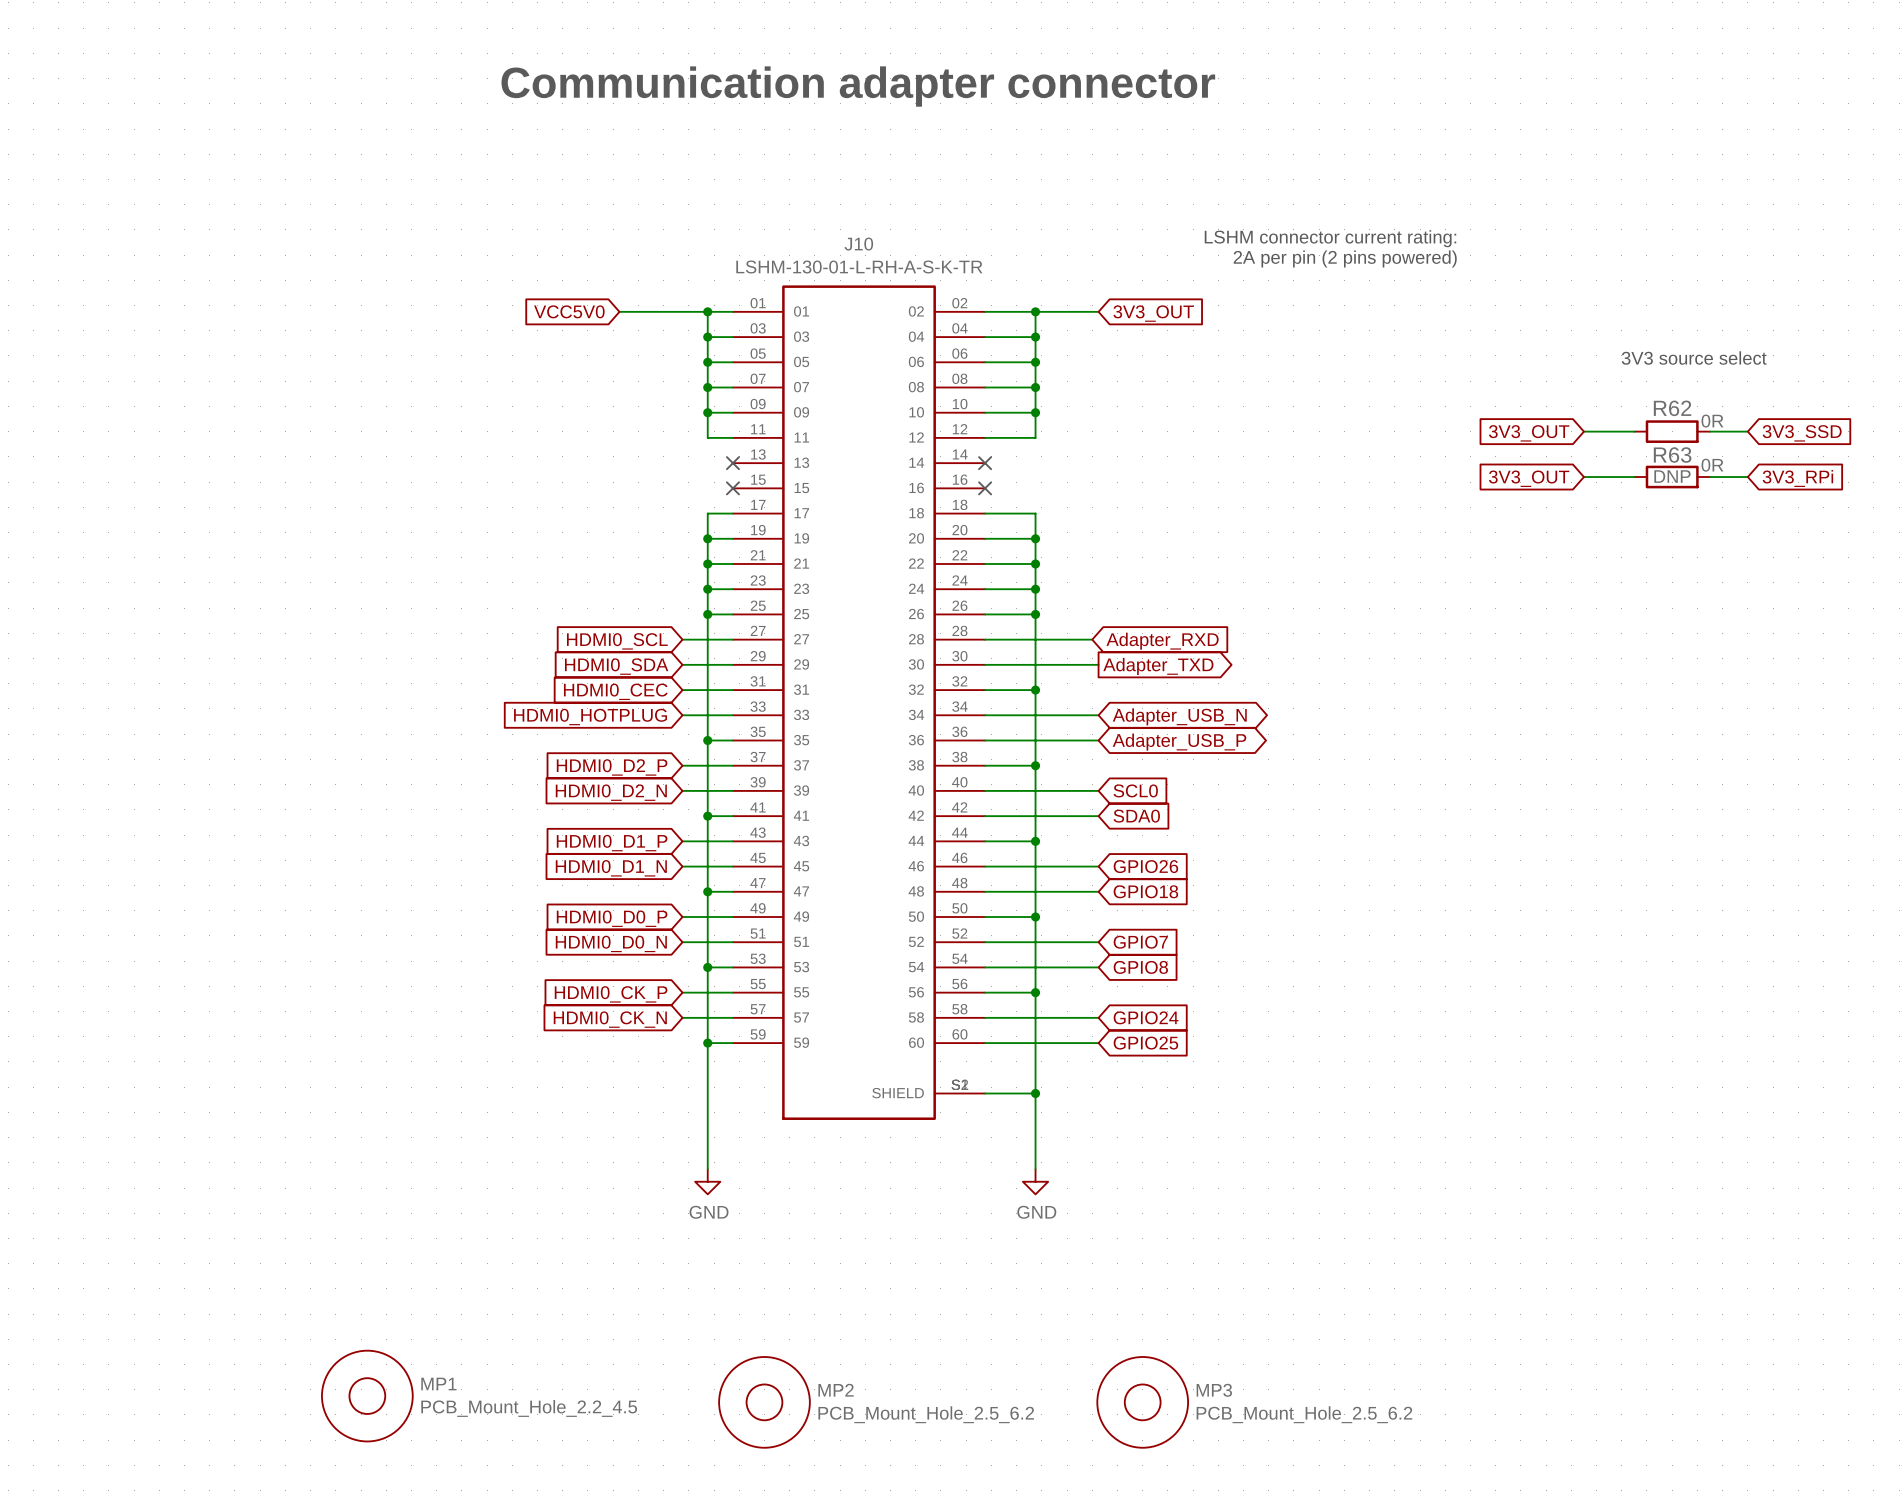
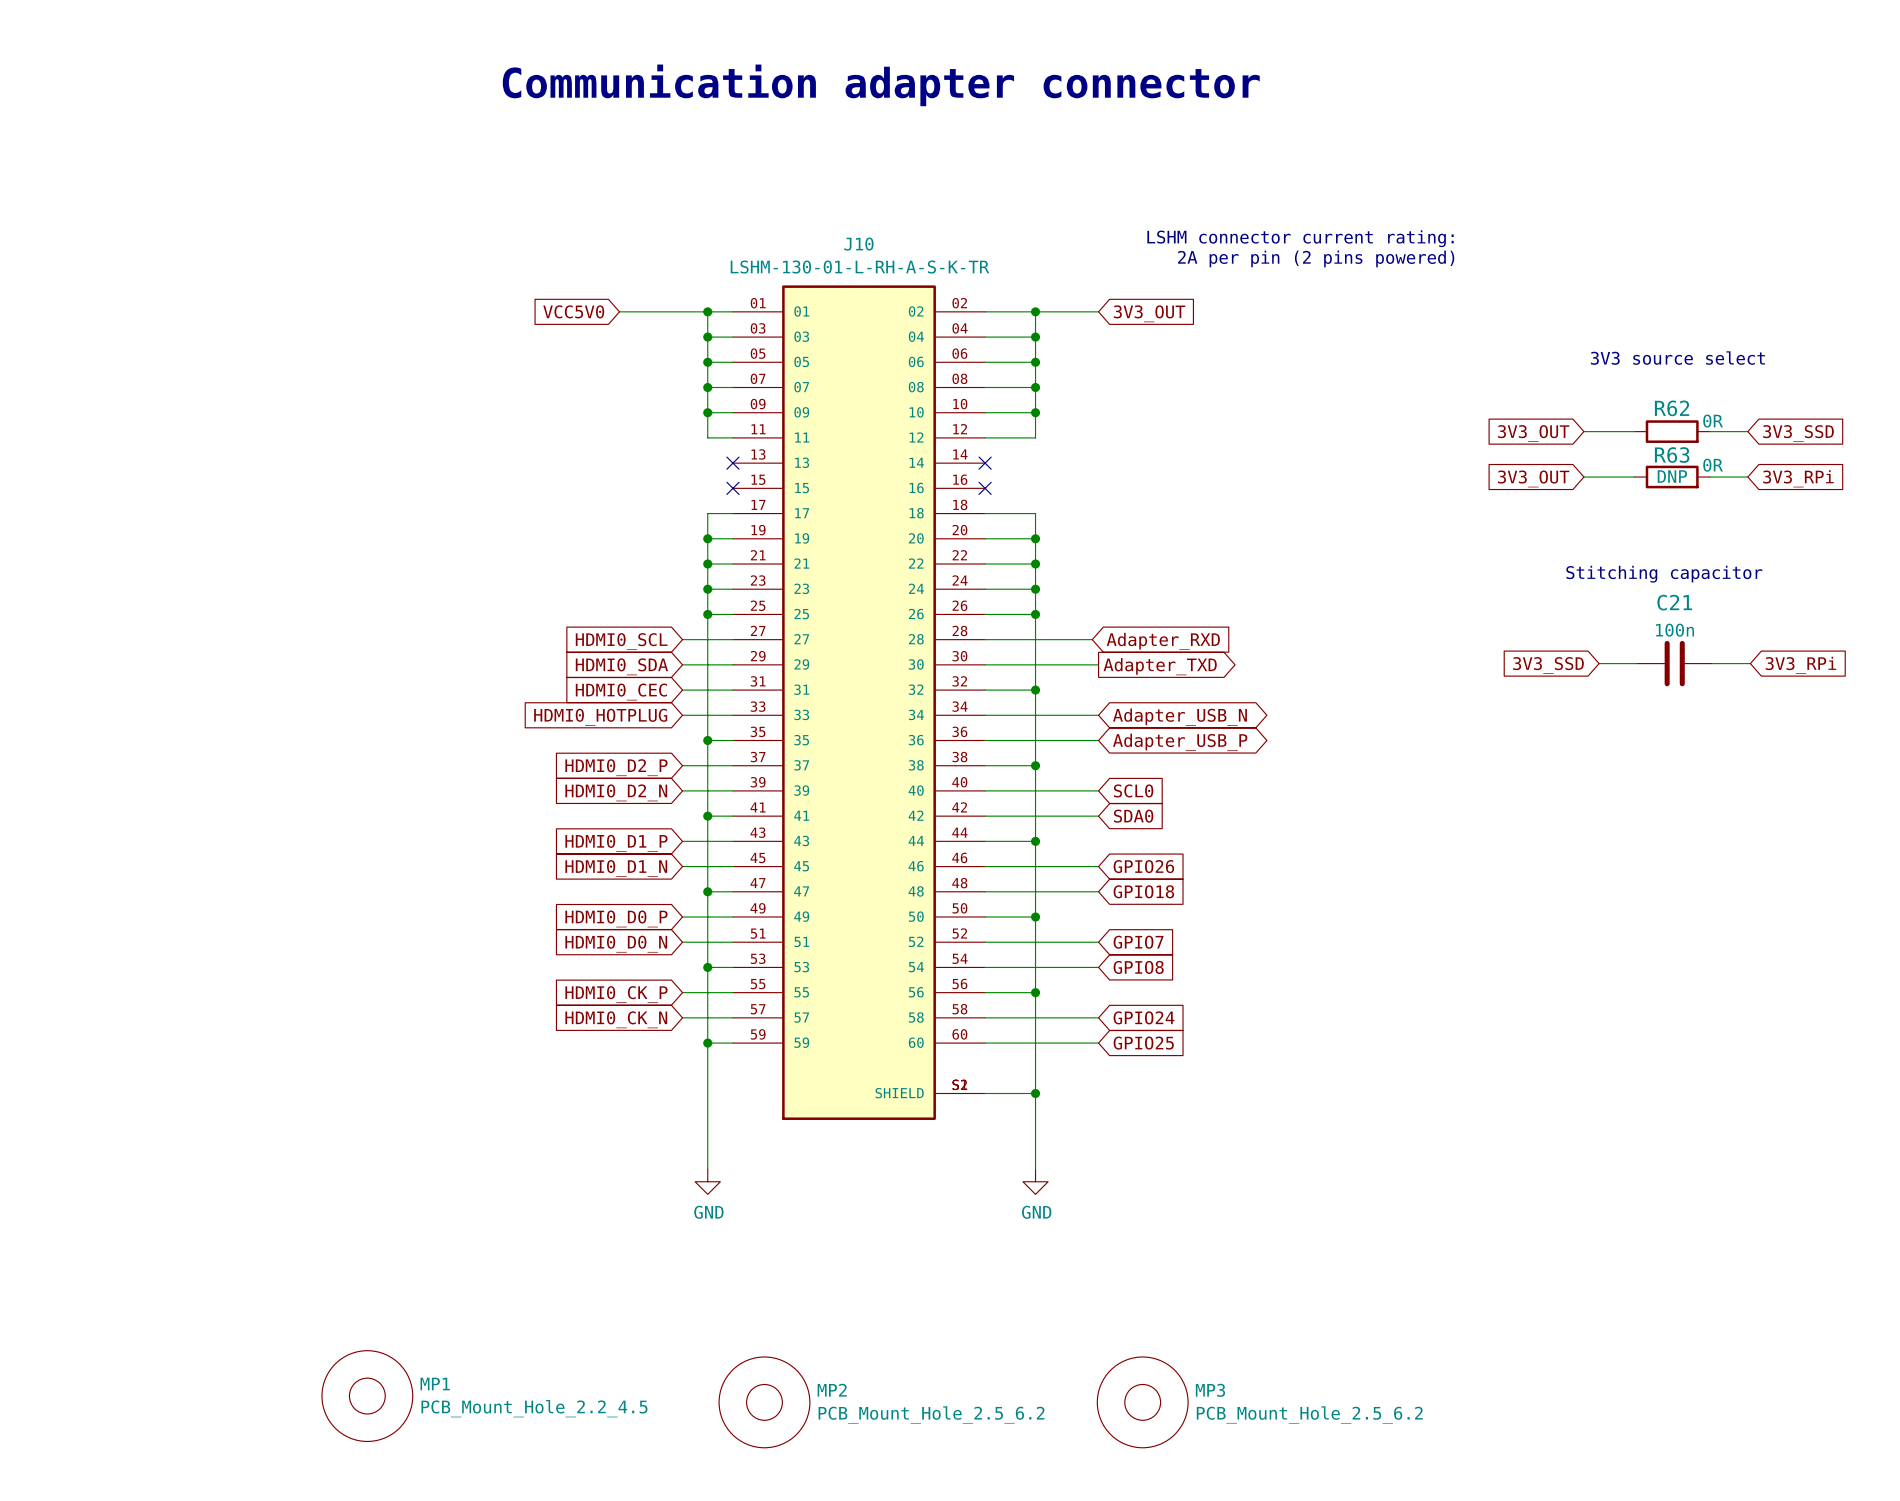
text: none -> Stitching capacitor (1664, 574)
wire: none -> (1599, 663) (1636, 663)
C21: none -> (1674, 663)
wire: none -> (1712, 663) (1750, 663)
global label: none -> 3V3_SSD (1548, 665)
global label: none -> 3V3_RPi (1800, 665)

